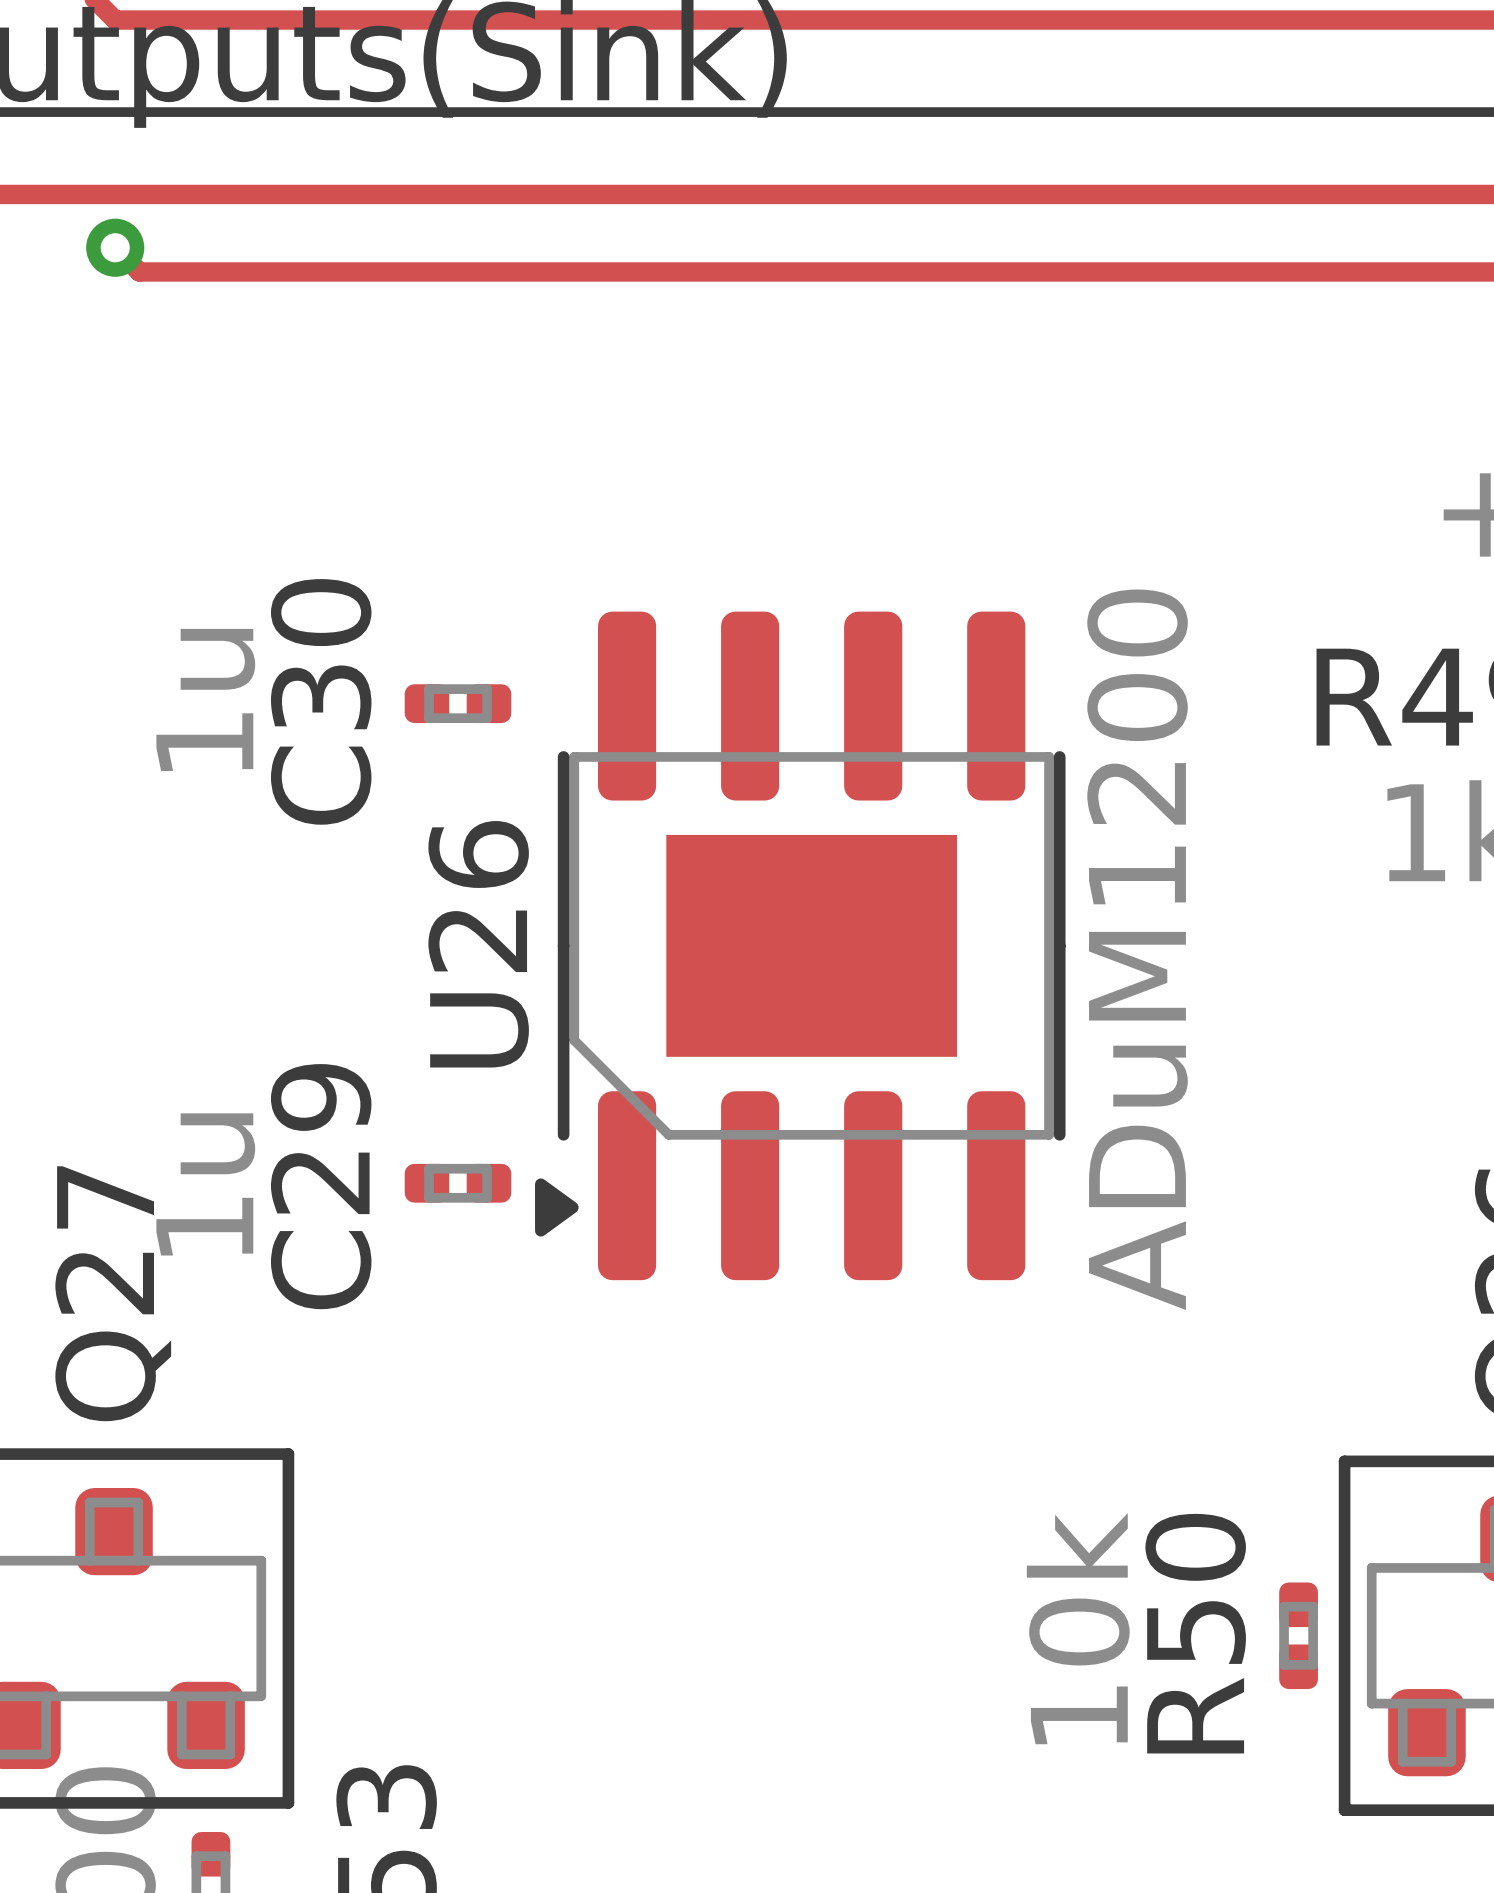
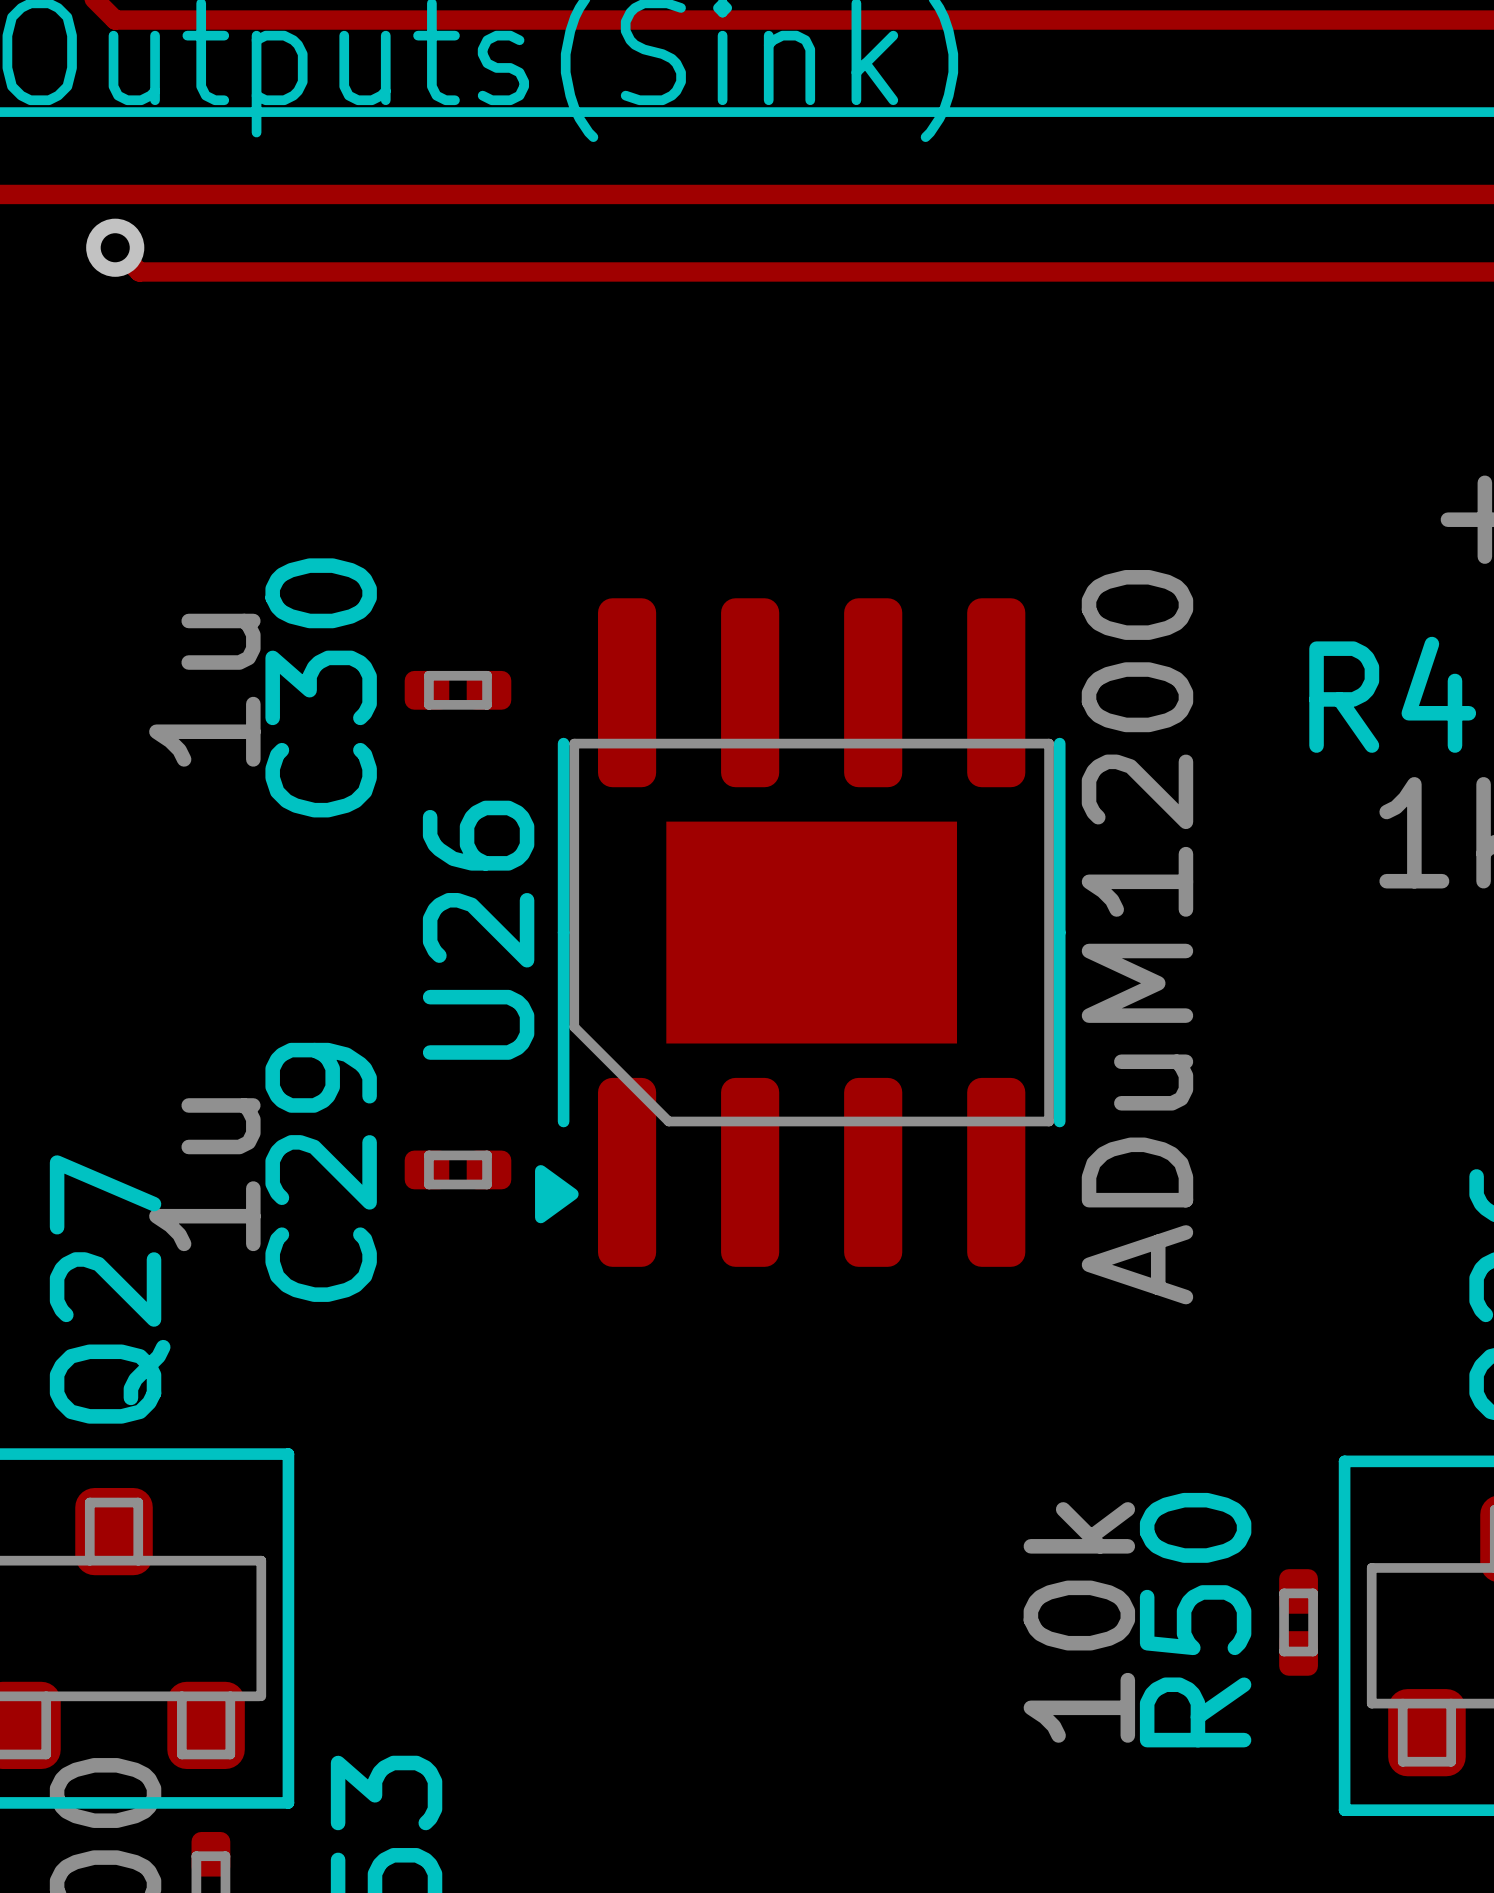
C30 position: (457, 703) -> (457, 690)
U26 position: (800, 945) -> (800, 932)
C29 position: (457, 1183) -> (457, 1169)
R50 position: (1298, 1635) -> (1298, 1622)

